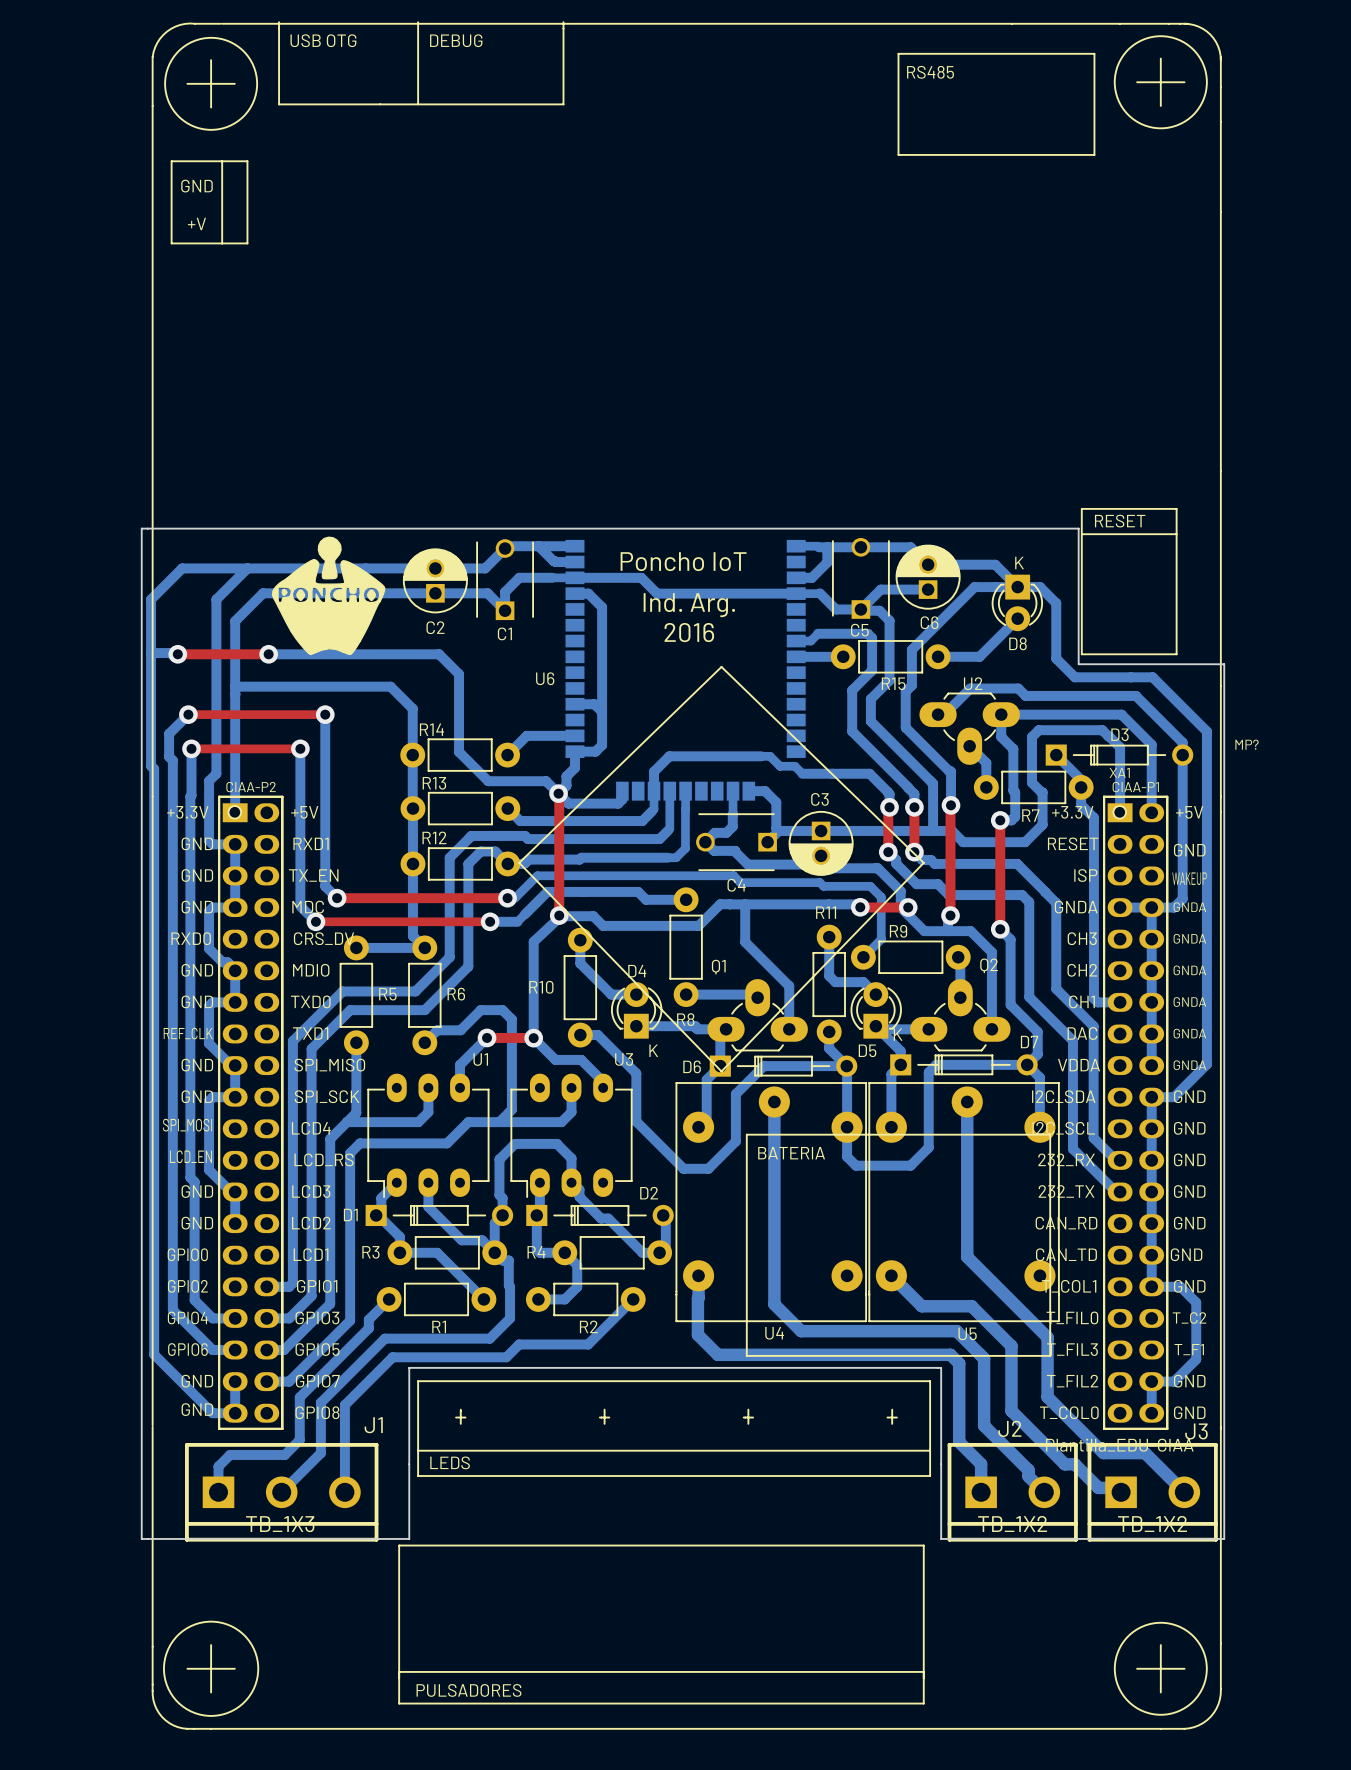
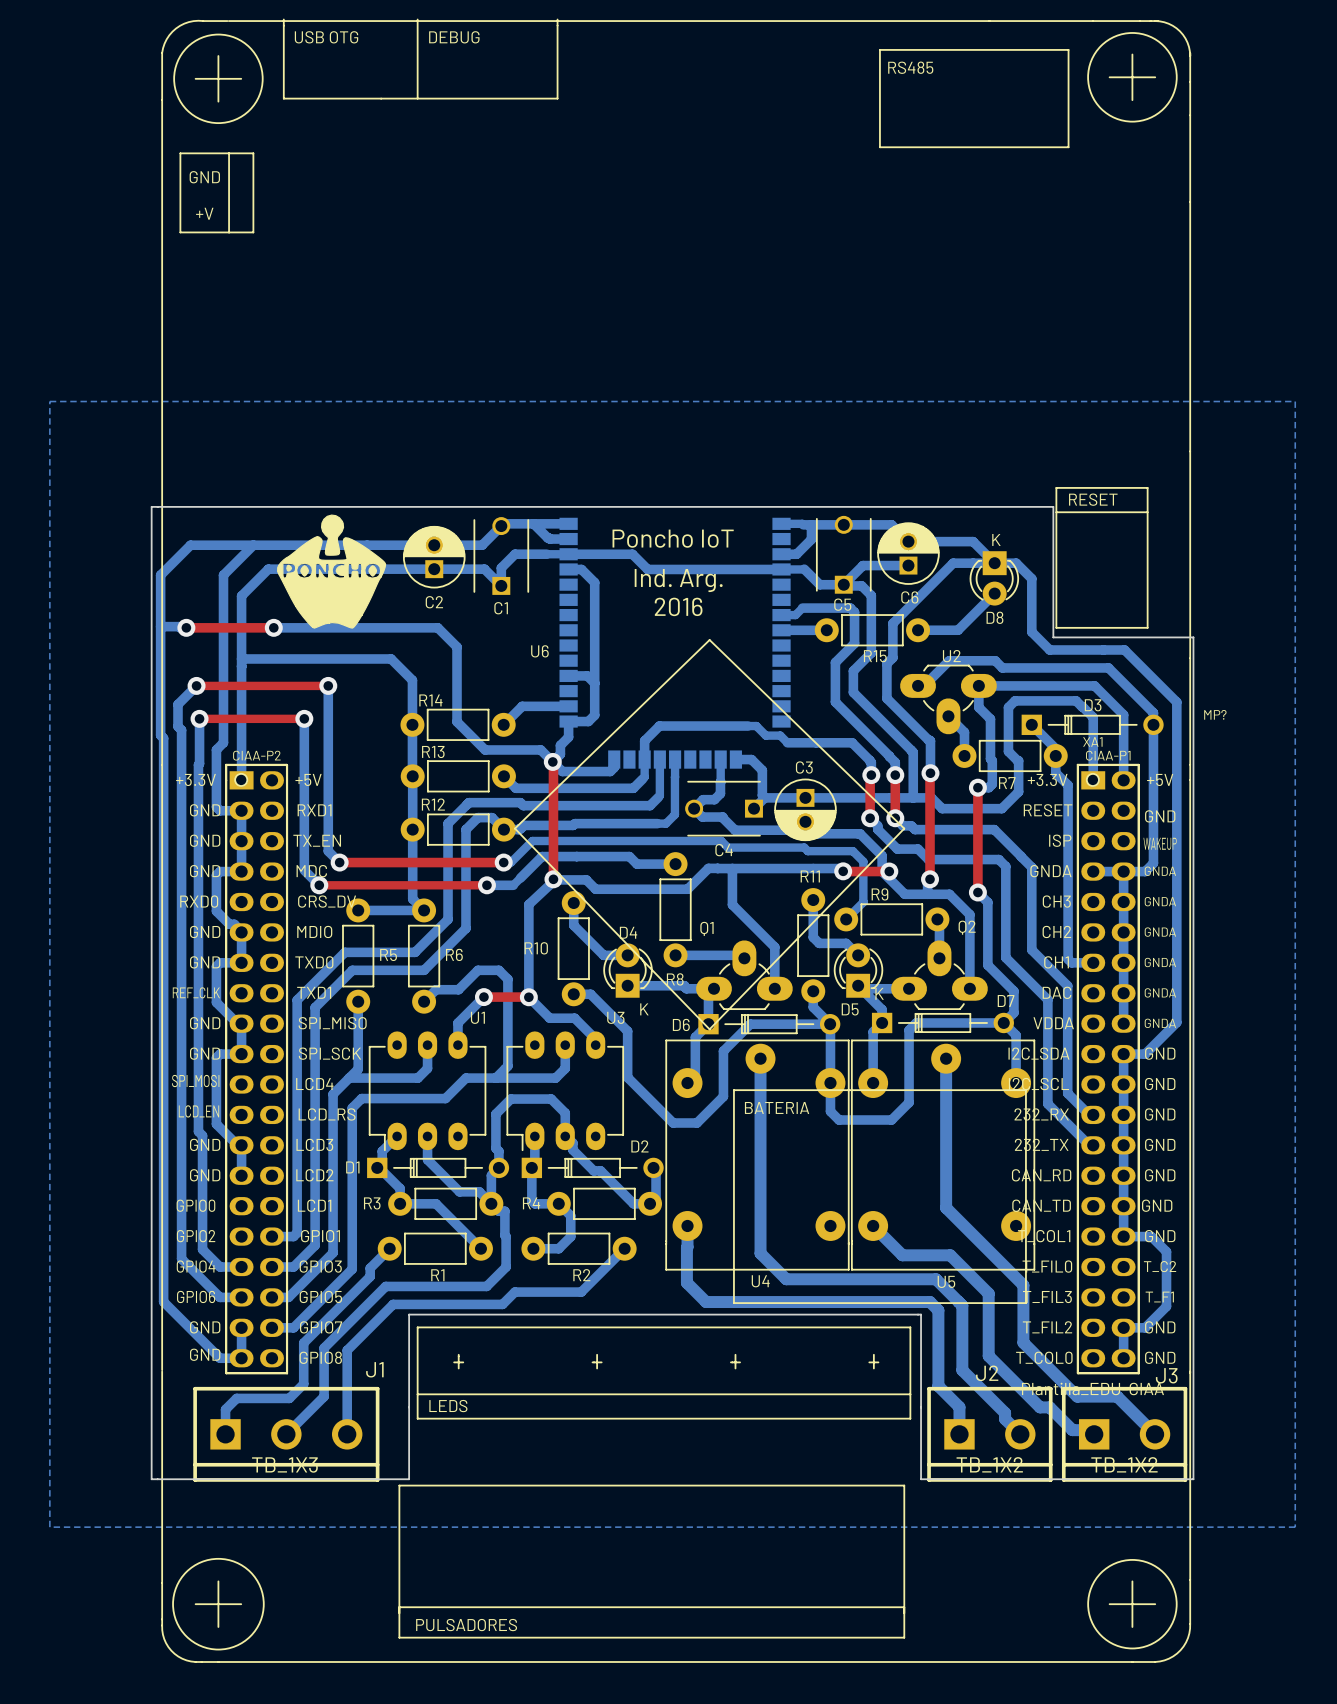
bottom zone outline: none -> (49, 401) (1295, 401) (1295, 1527) (49, 1527) (49, 401)

